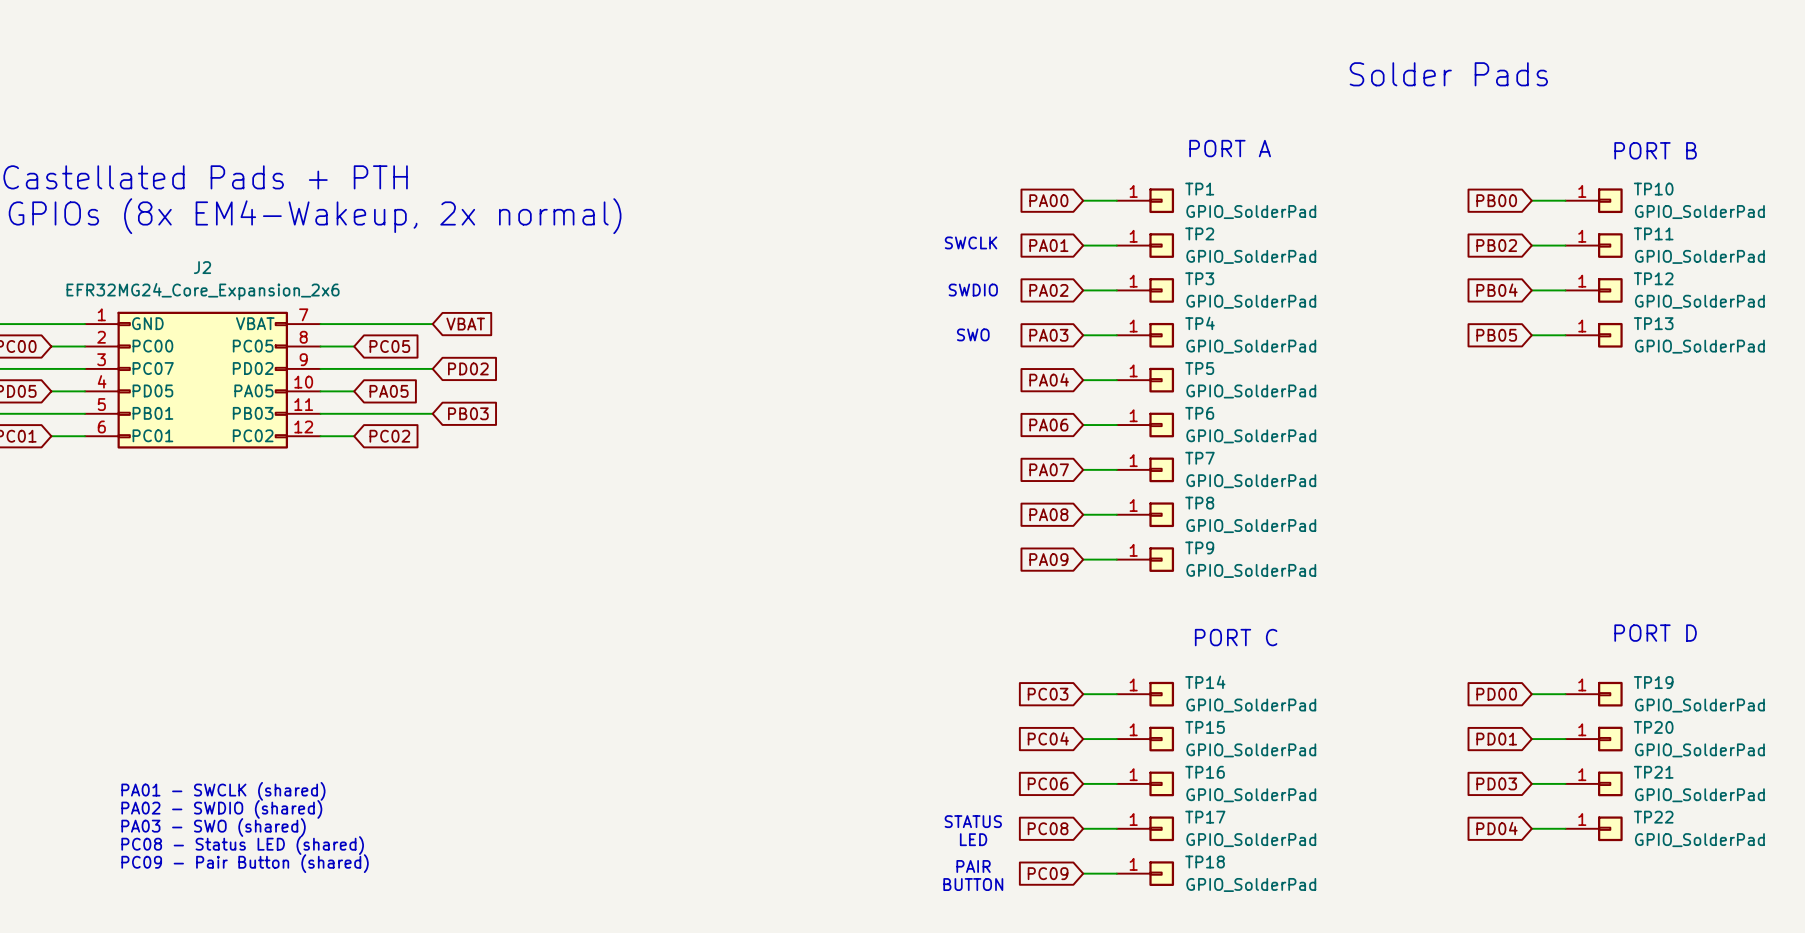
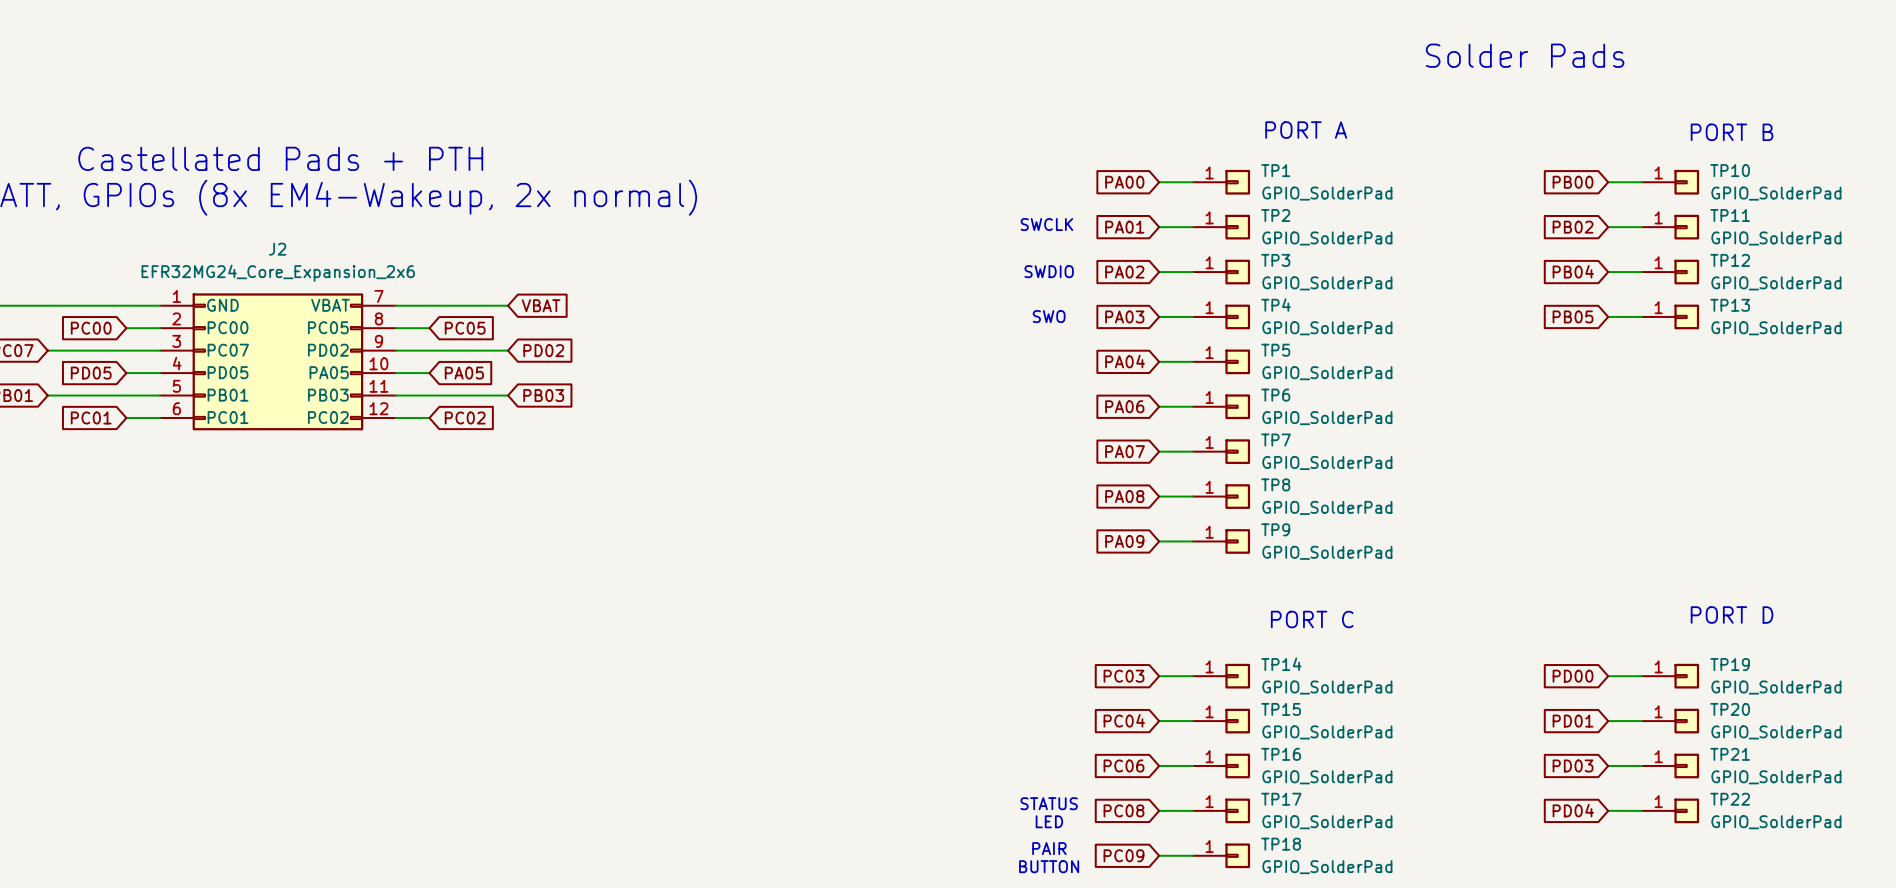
text: PA01 - SWCLK (shared) (223, 791) -> none
text: PA02 - SWDIO (shared) (221, 809) -> none
text: PA03 - SWO (shared) (213, 827) -> none
text: PC08 - Status LED (shared) (242, 845) -> none
text: PC09 - Pair Button (shared) (245, 863) -> none

